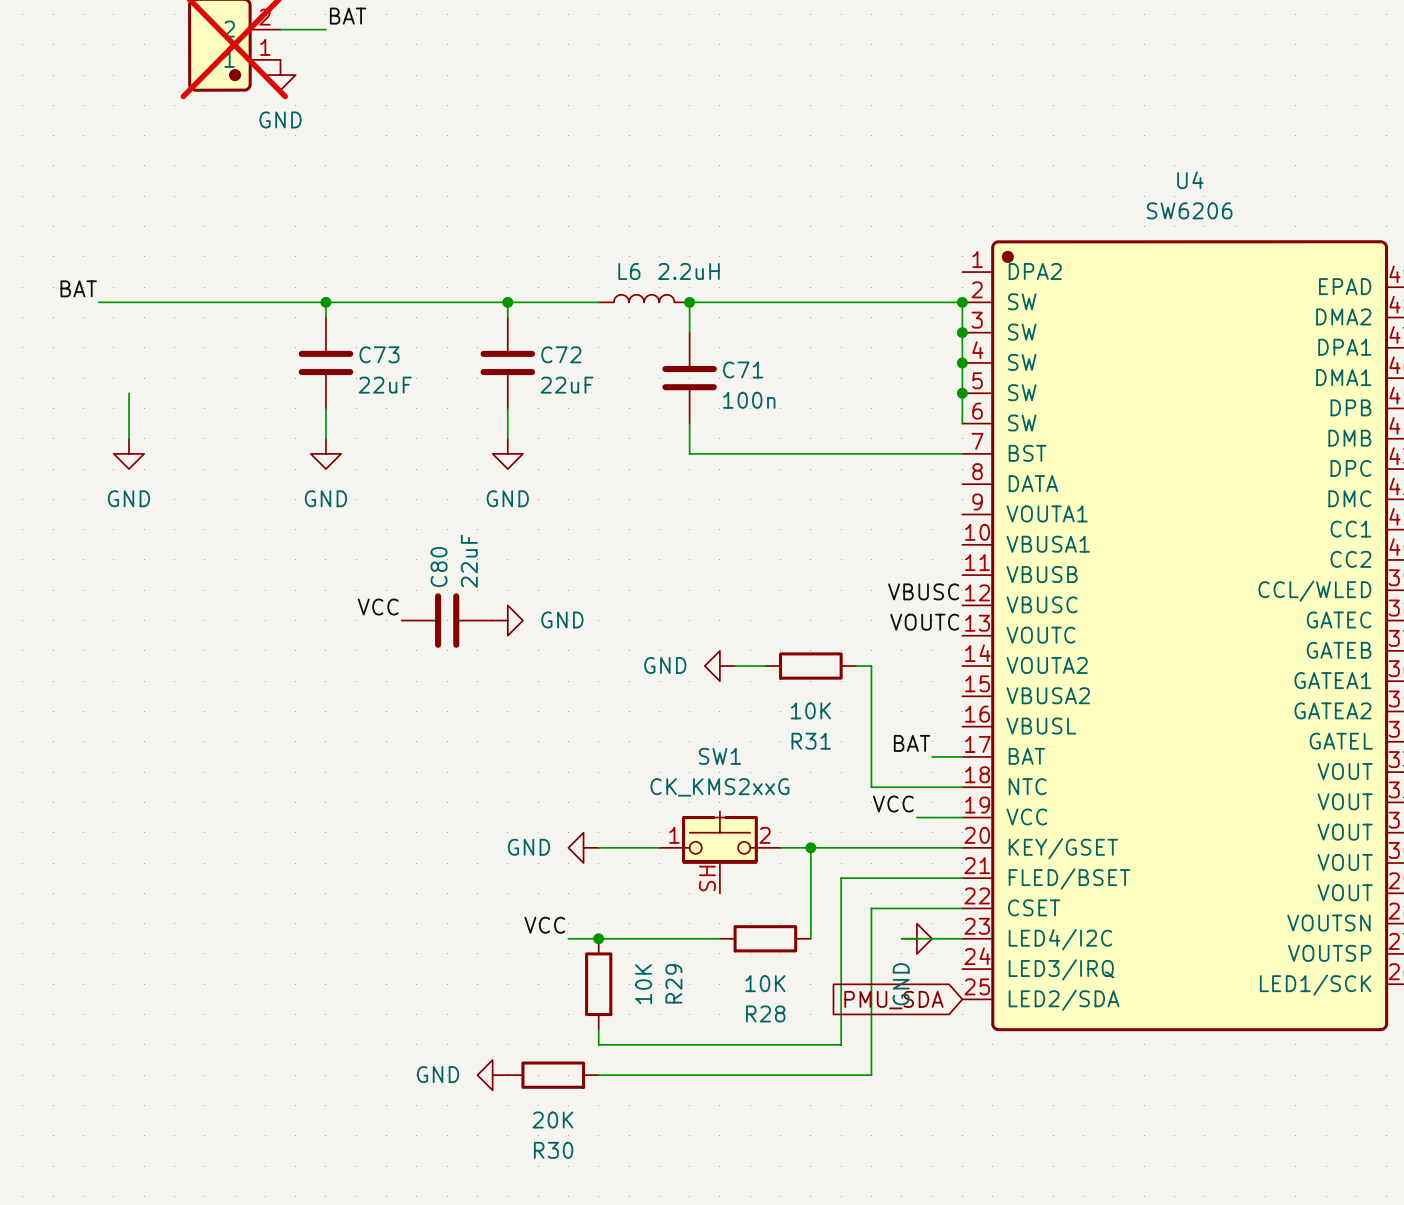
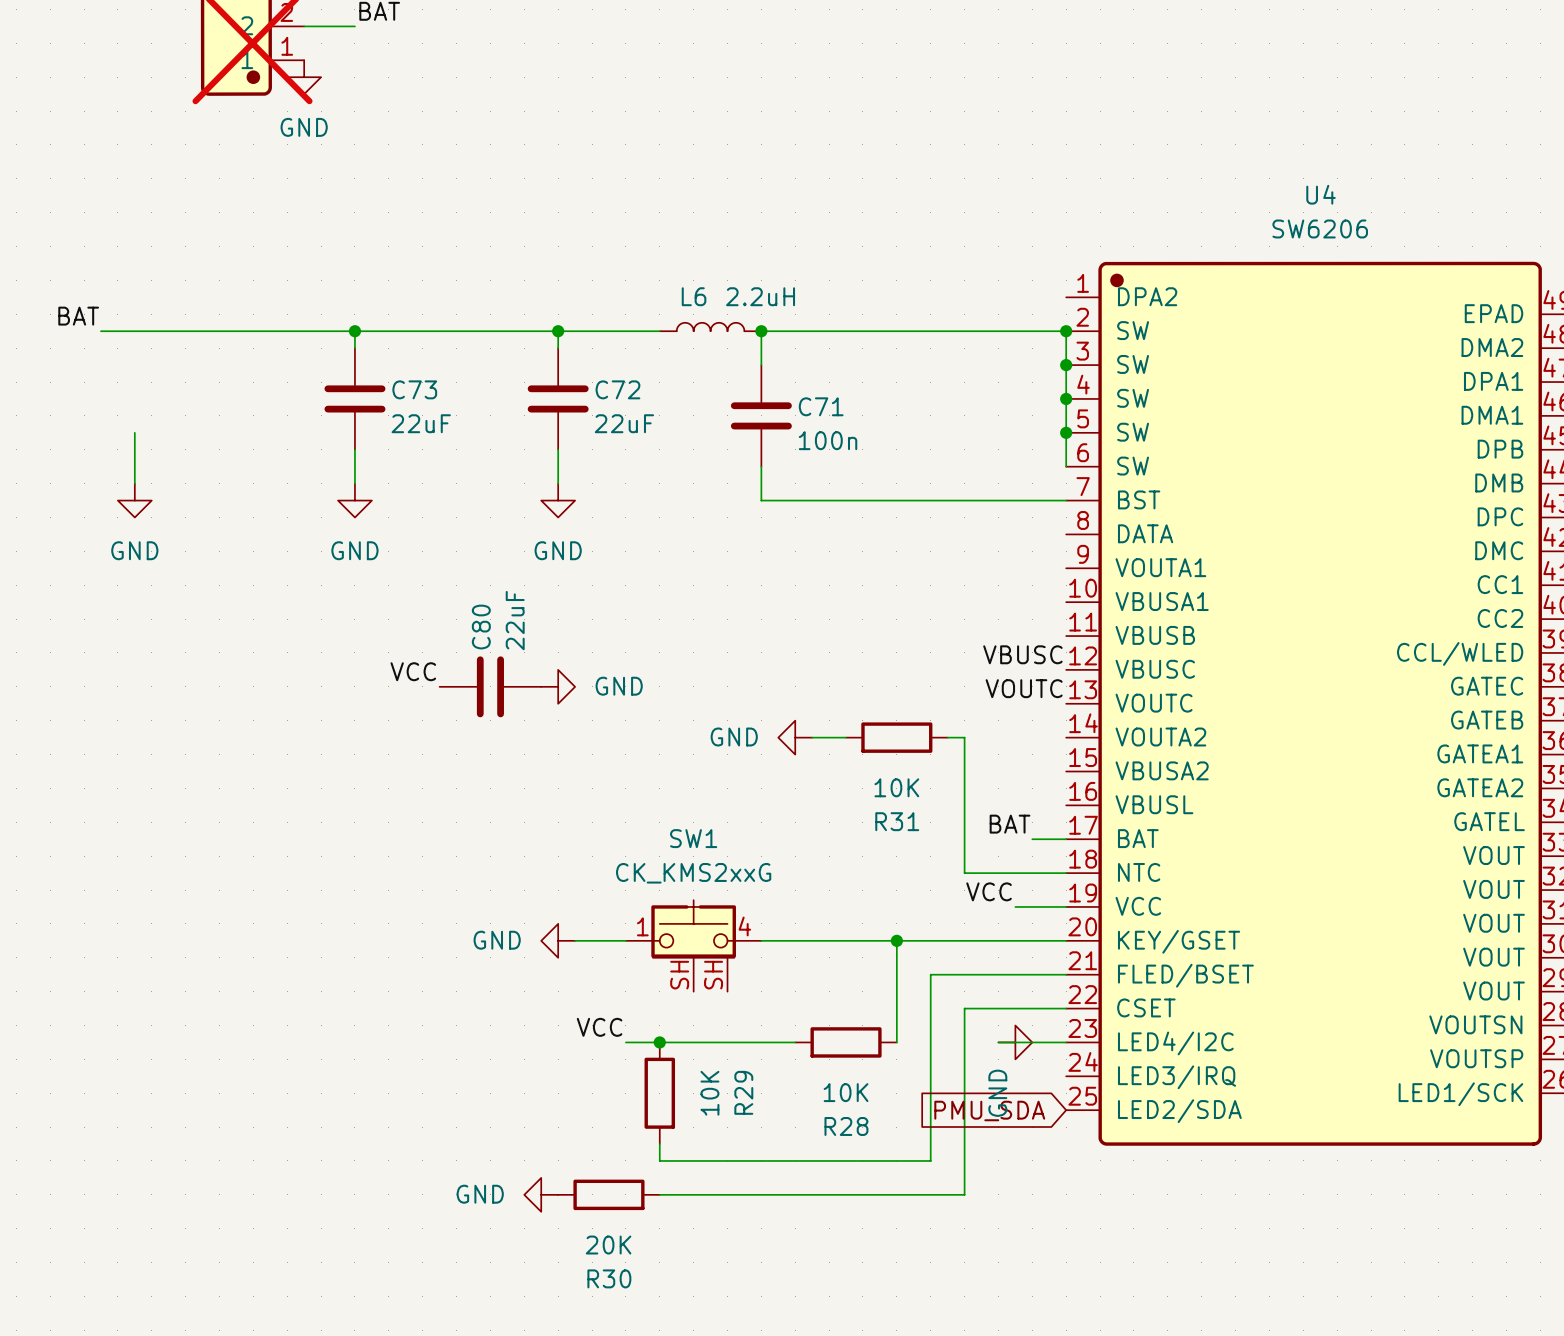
SW1 symbol: [659, 811, 781, 894] -> [625, 900, 762, 992]
wire: none -> (575, 940) (625, 940)
power symbol position: GND (583, 847) -> GND (558, 940)

